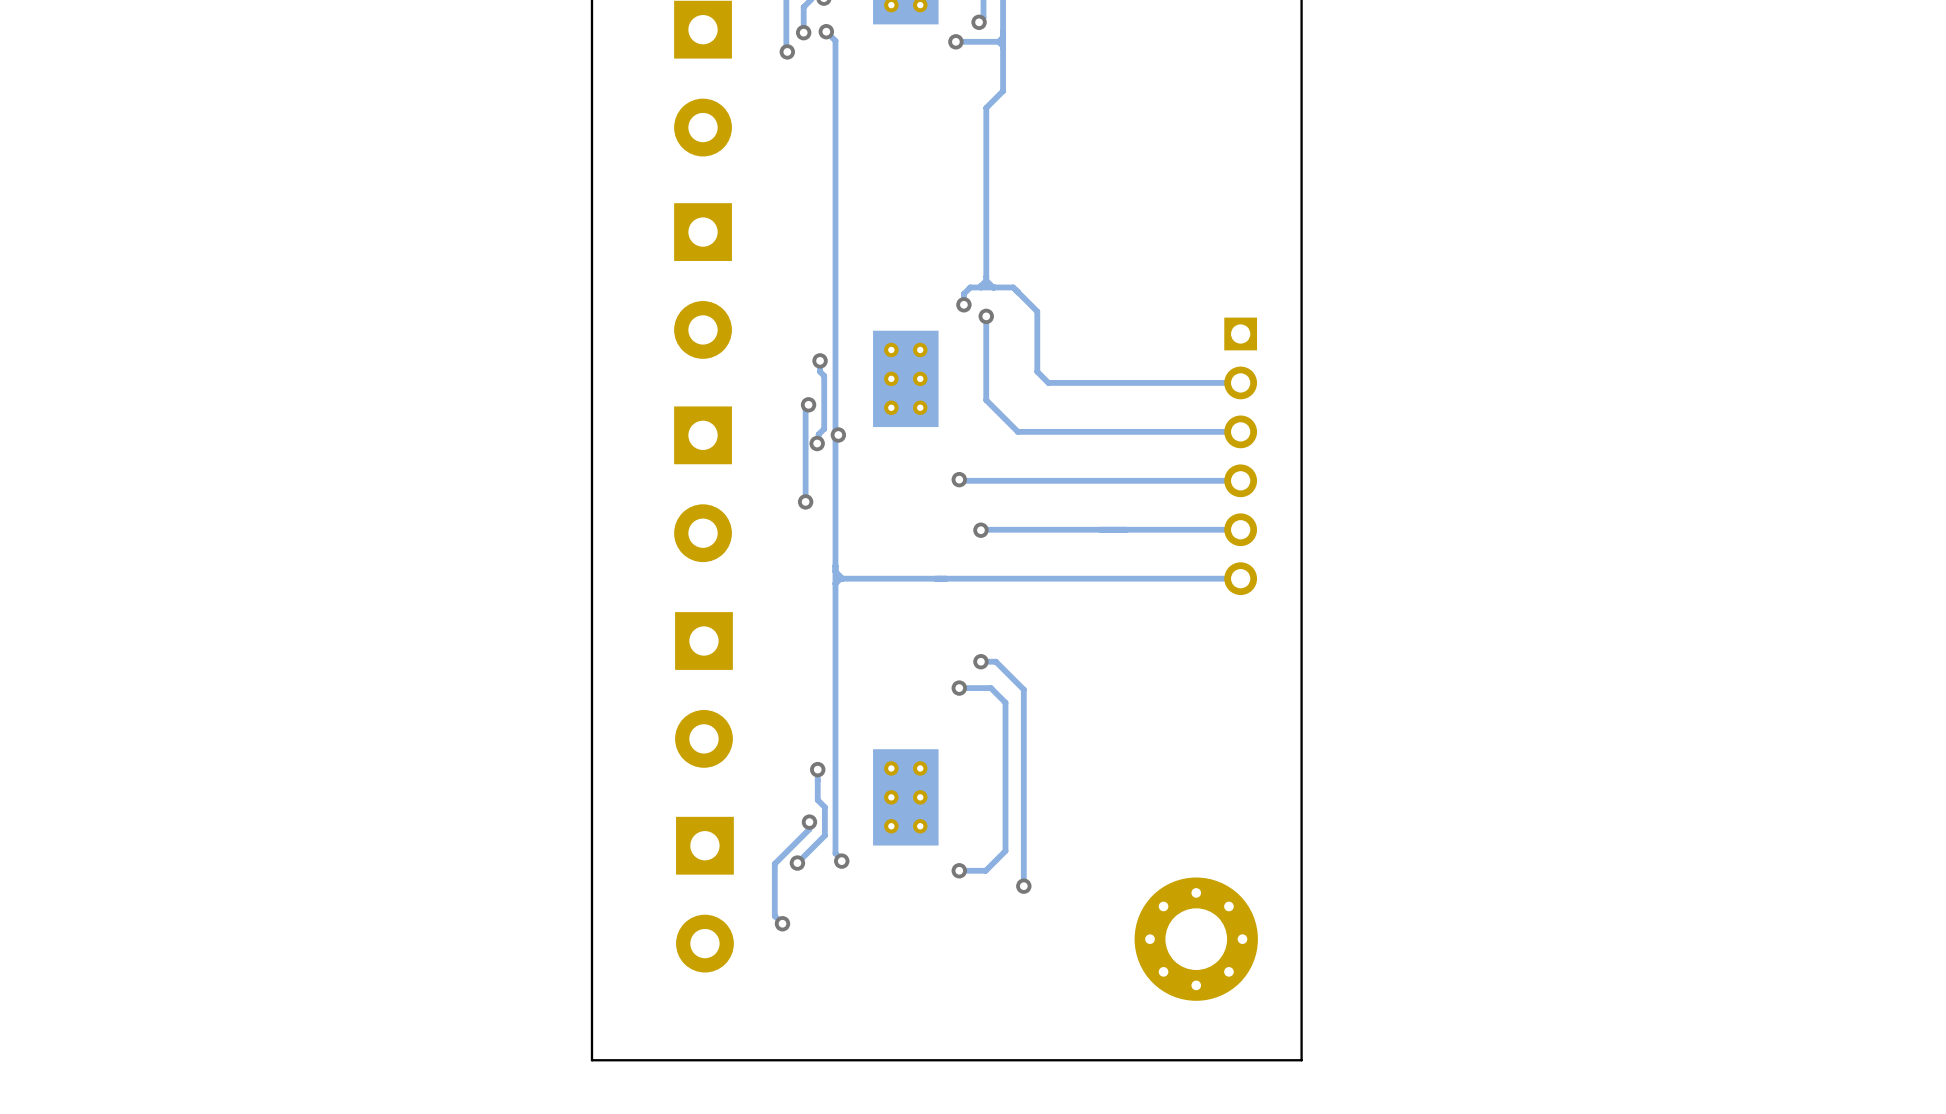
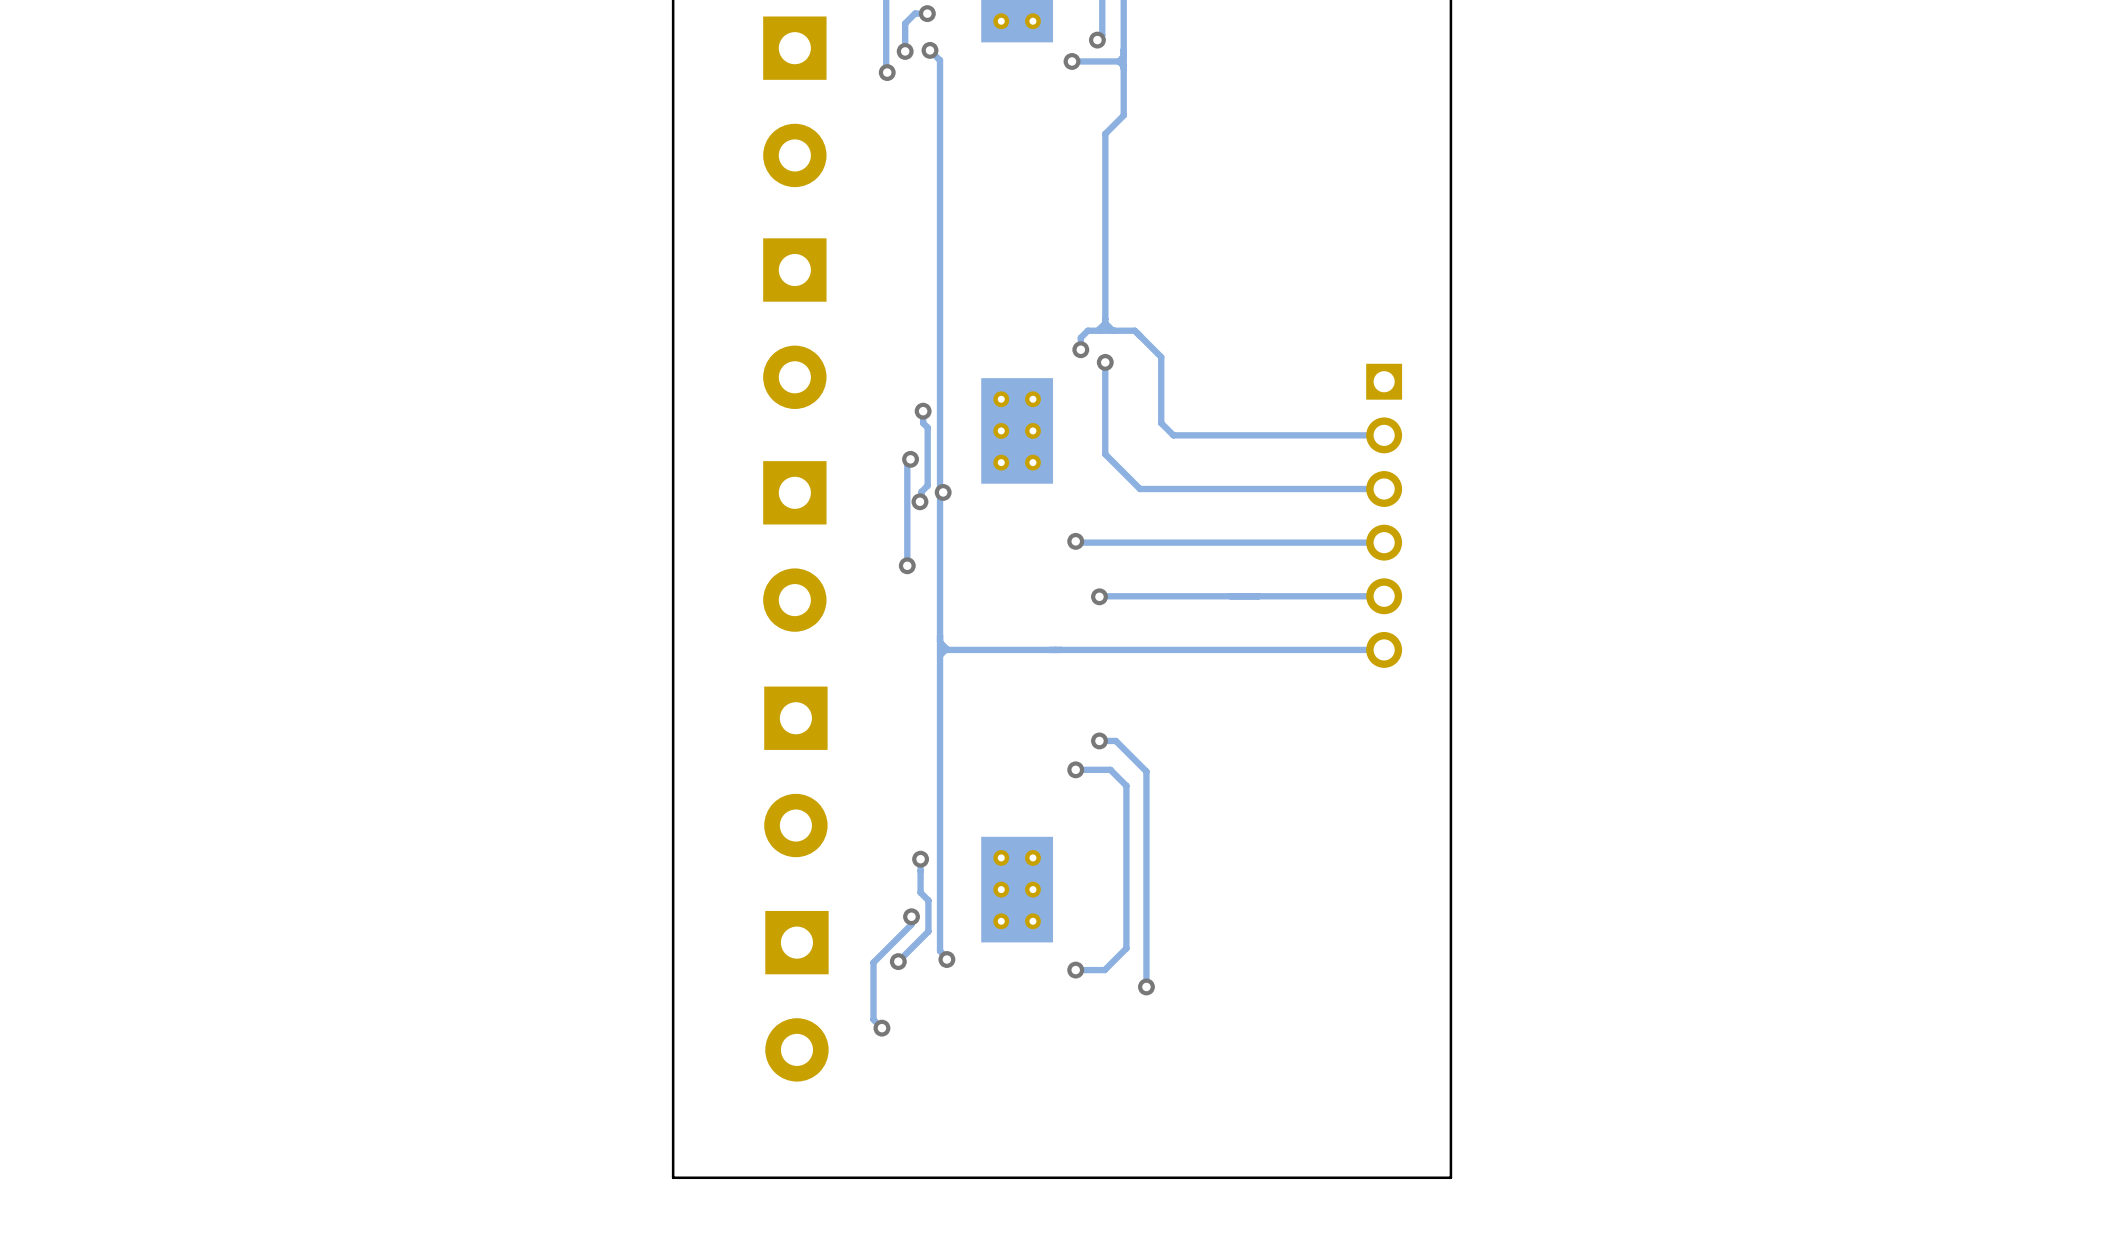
part: (1196, 939) -> none

